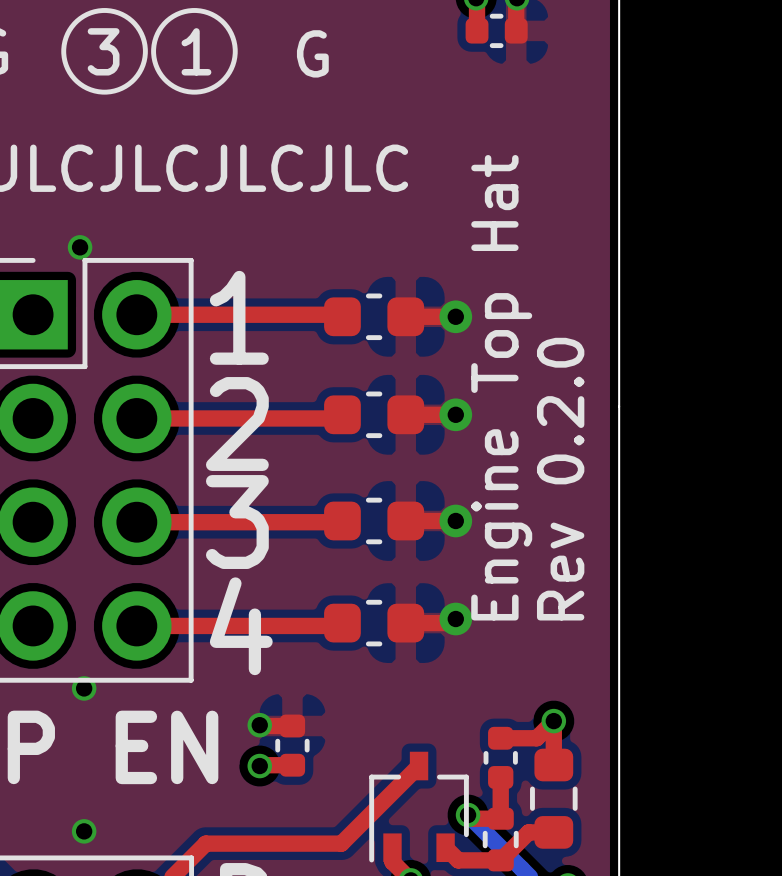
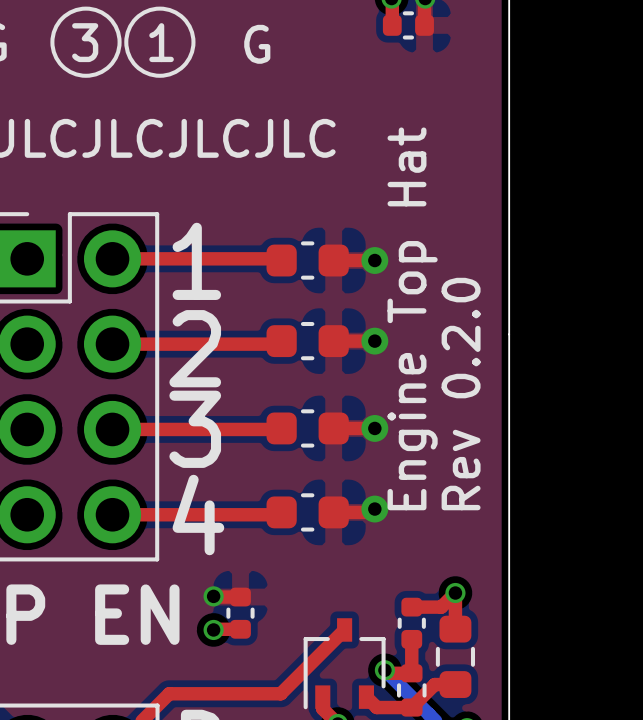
via: (80, 247) -> none
via: (84, 688) -> none
via: (84, 831) -> none

